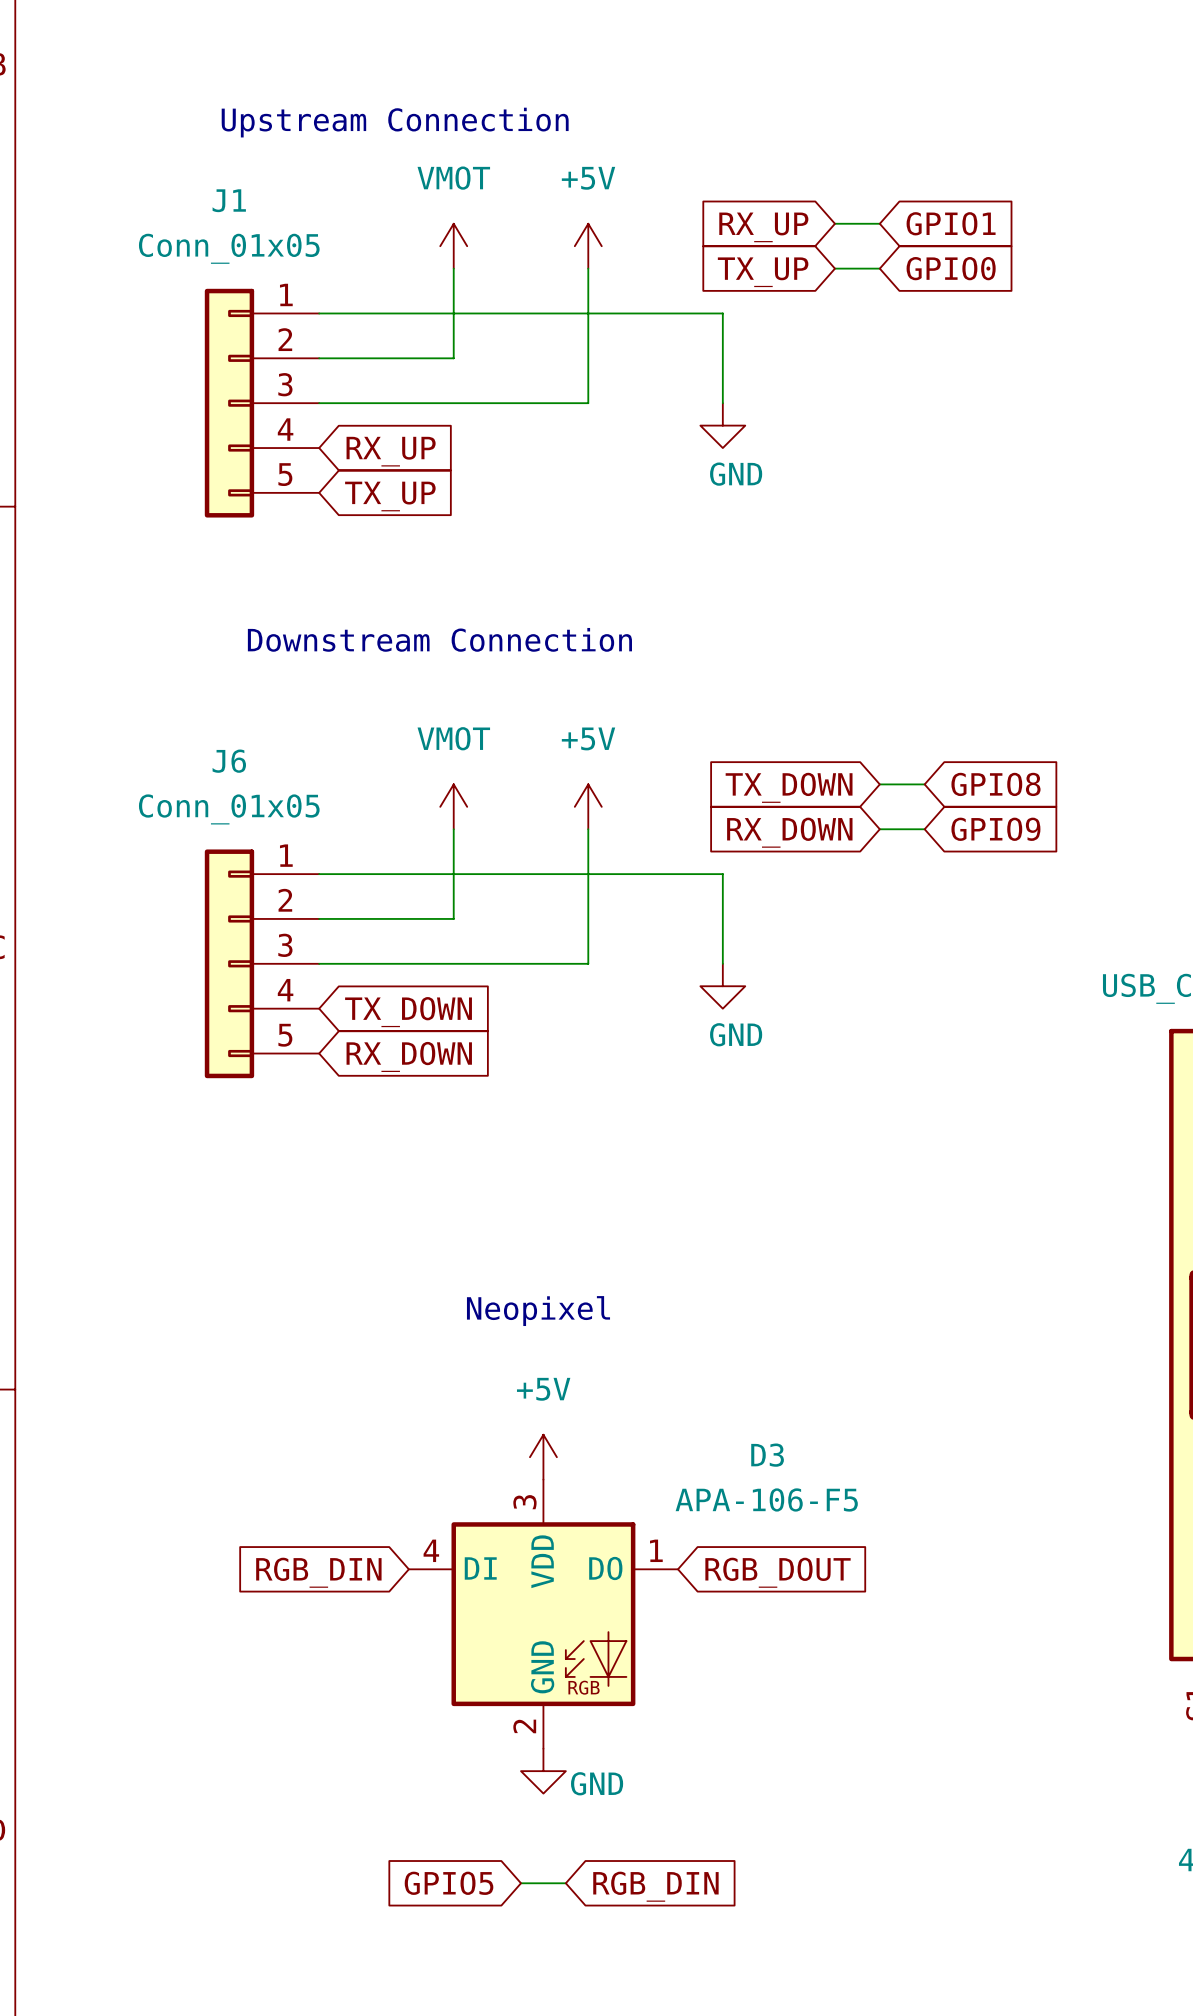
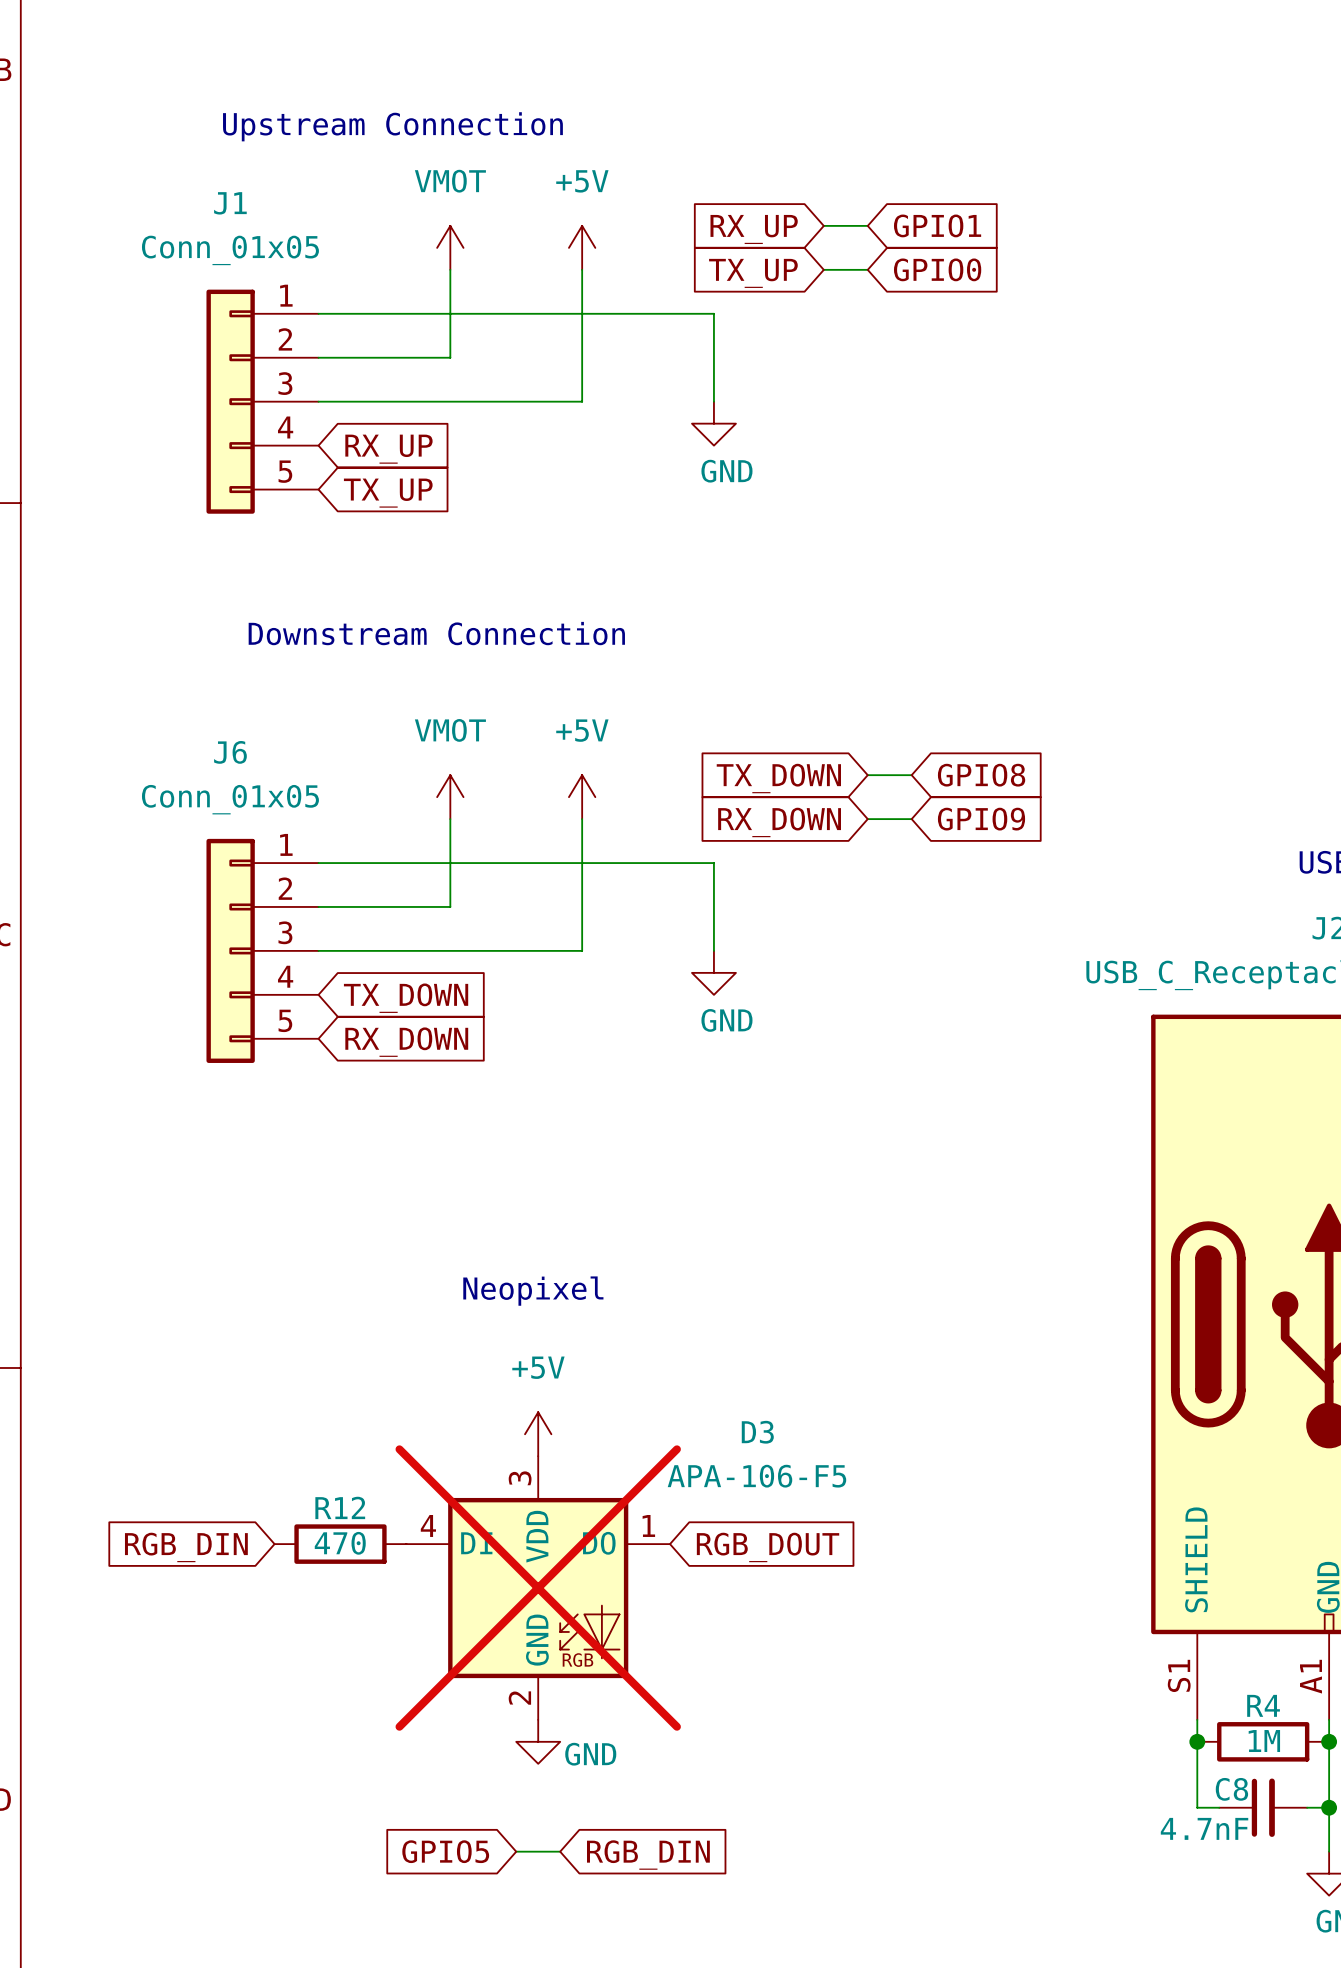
R12: none -> 470 (340, 1544)
global label position: RGB_DIN (318, 1572) -> RGB_DIN (186, 1547)
D3 do-not-place cross: none -> (538, 1588)

